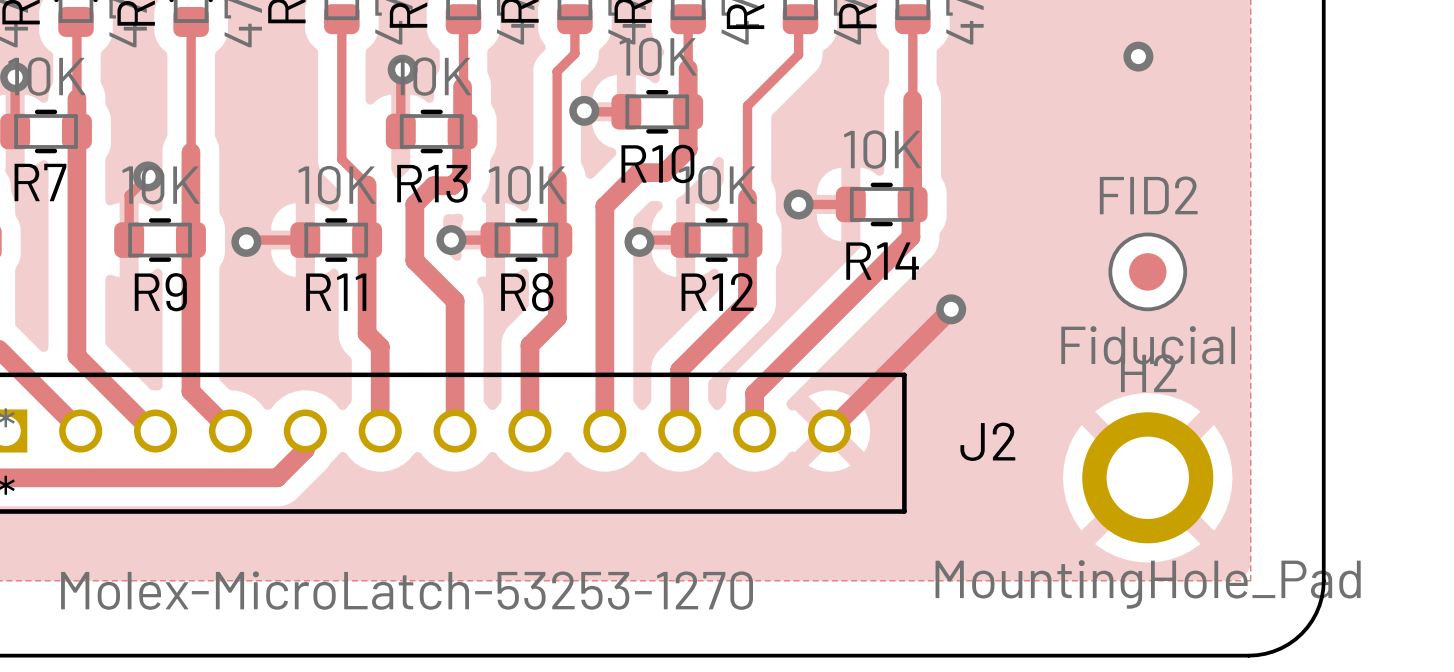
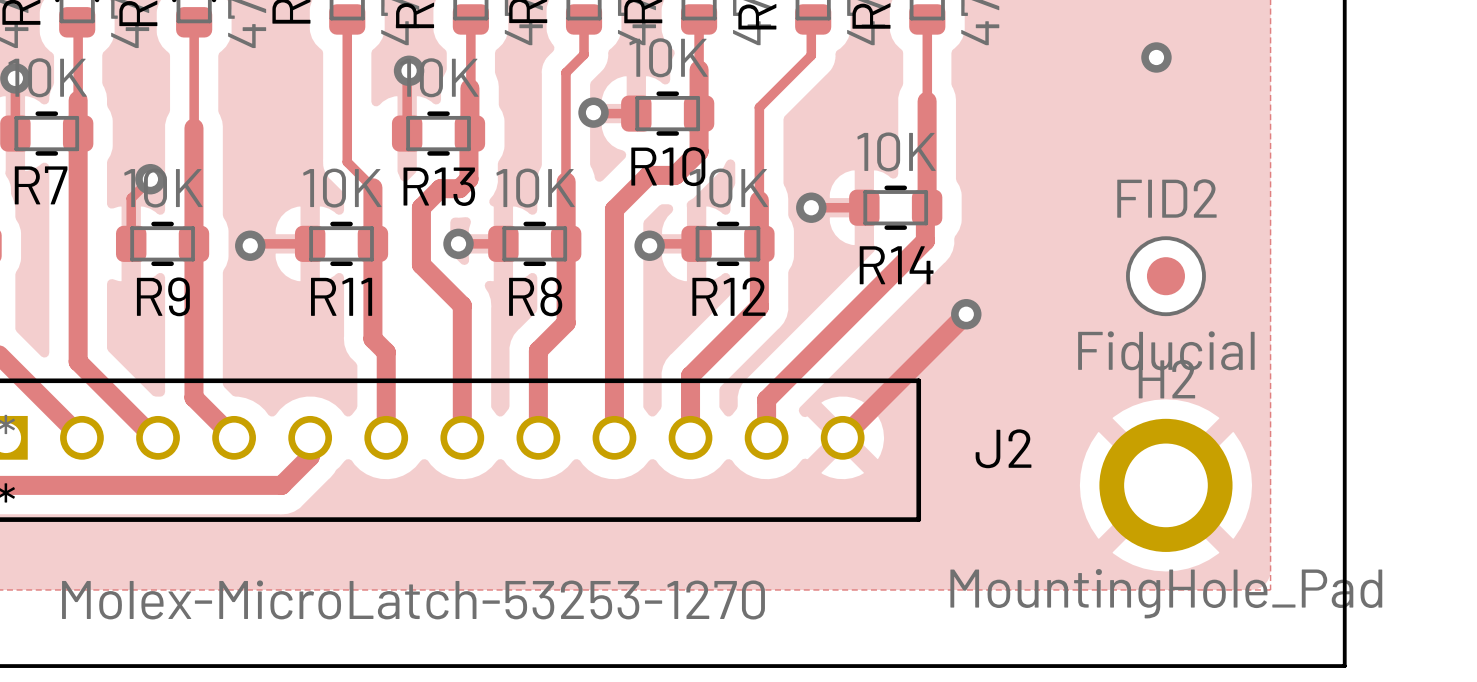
track width: thin (191, 125) (191, 152) -> thick (194, 127) (194, 154)
board edge: (1323, 580) (1321, 597) (1316, 613) (1301, 633) (1288, 644) (1273, 651) (1248, 655) -> (1344, 589) (1344, 666) (1268, 666)

